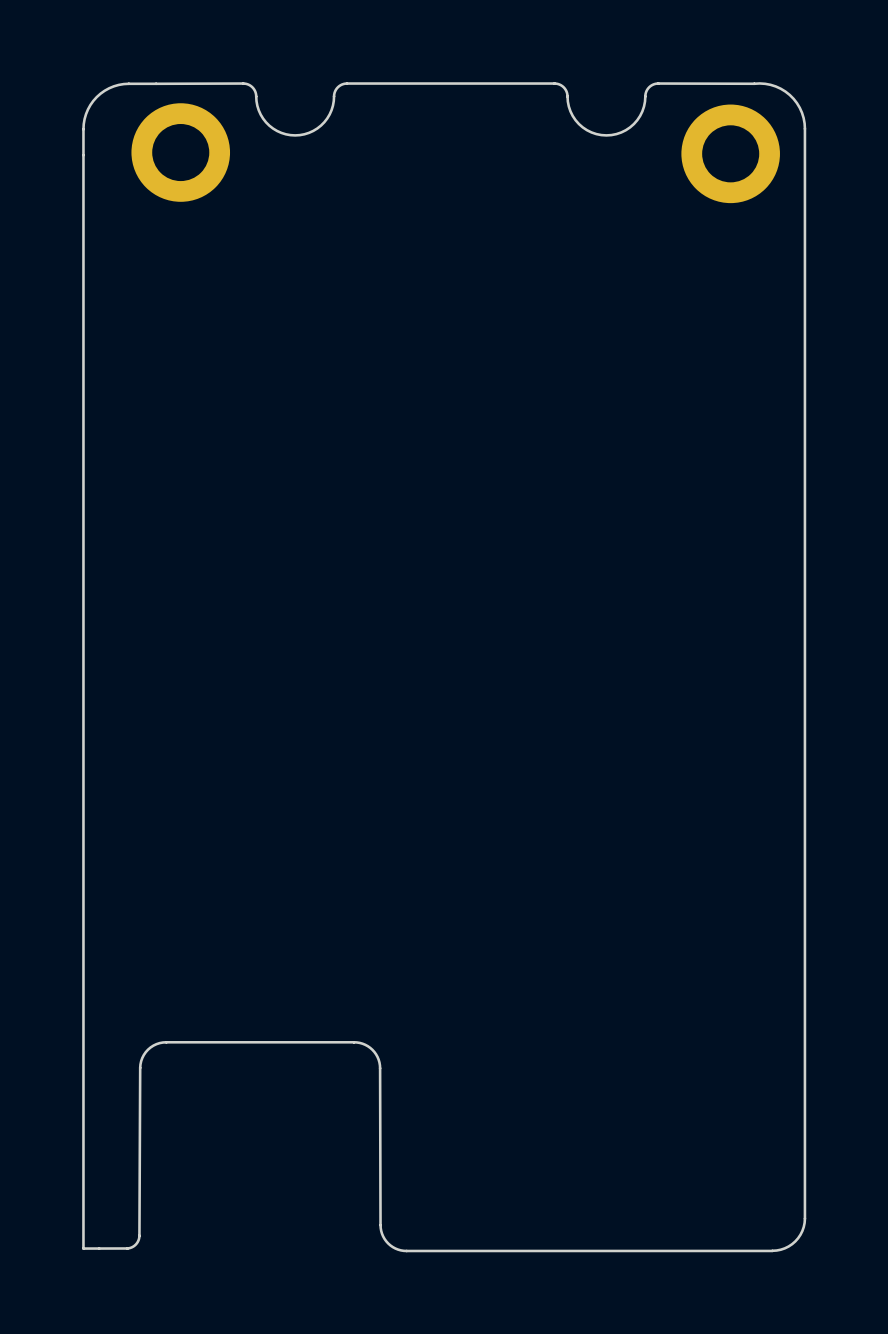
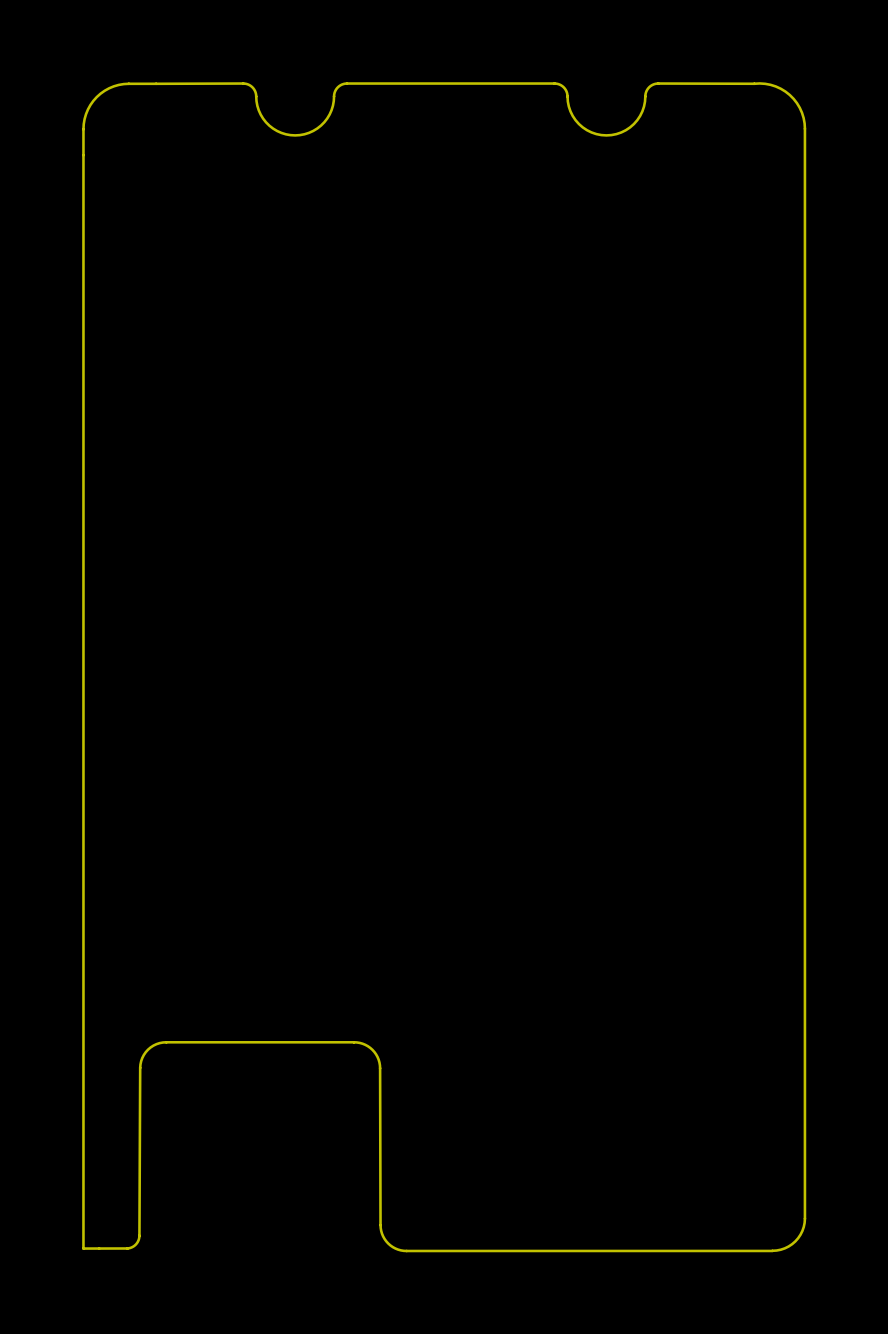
part: (180, 152) -> none
part: (730, 153) -> none

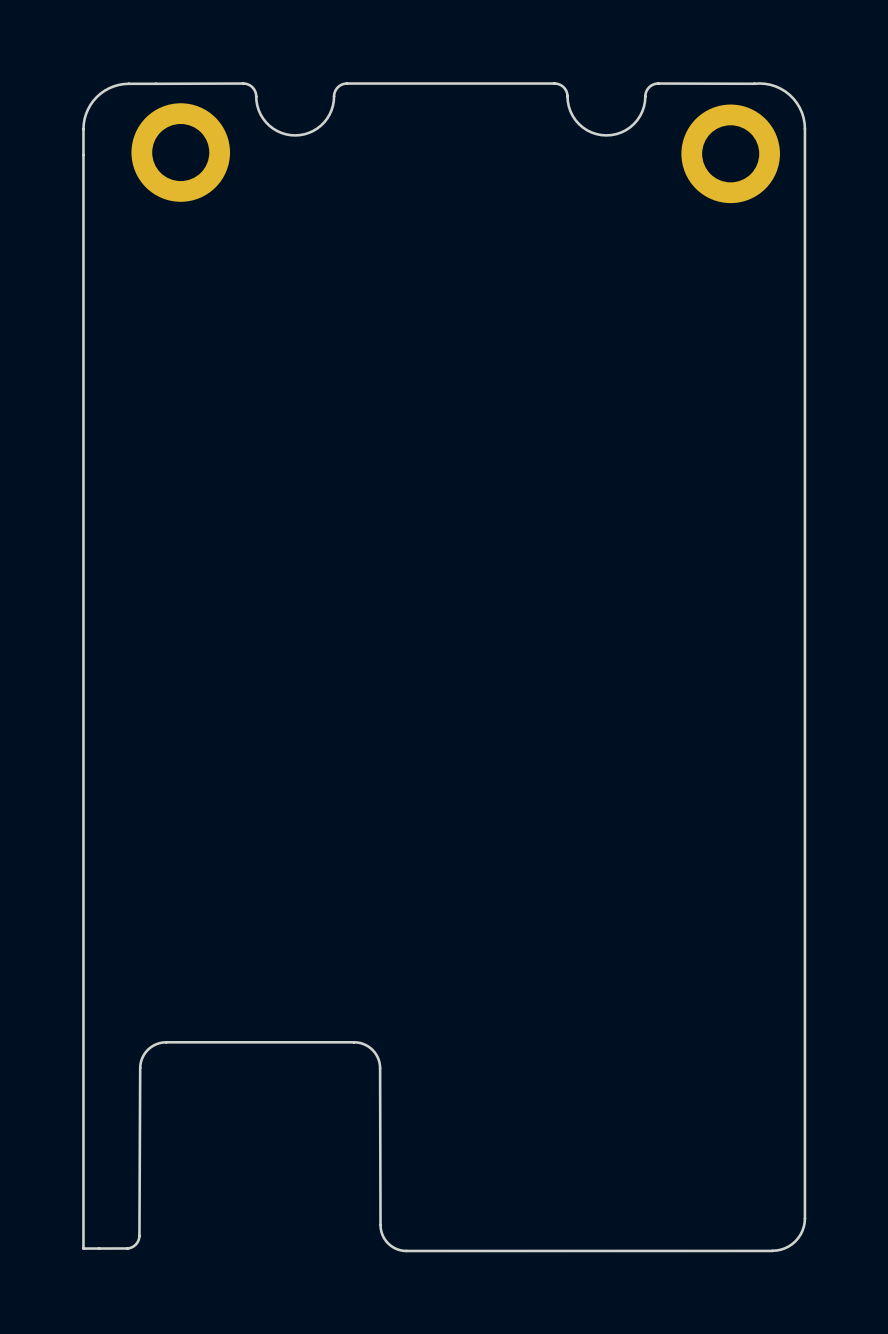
part: none -> (180, 152)
part: none -> (730, 153)

